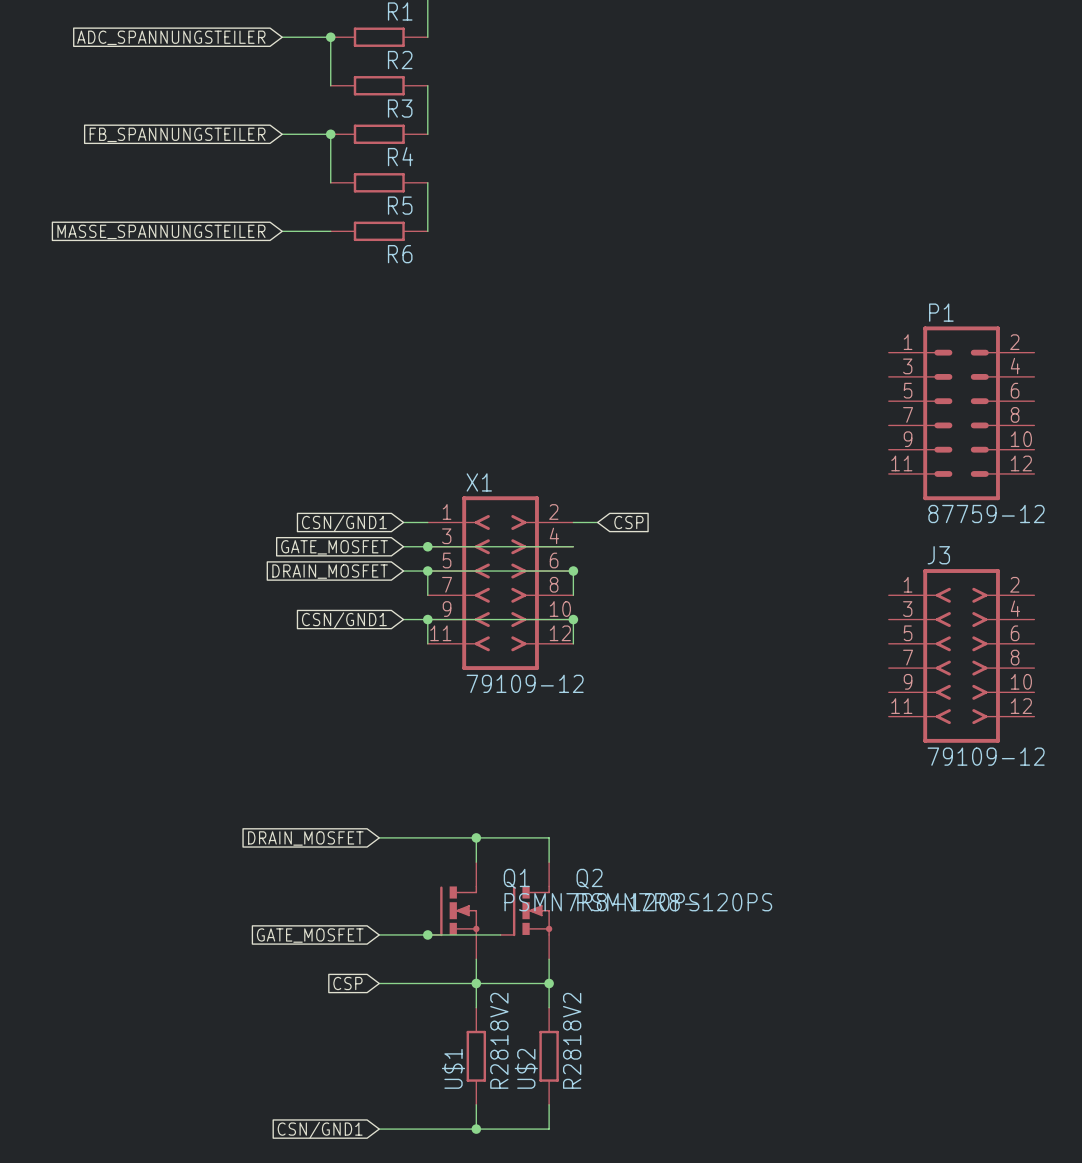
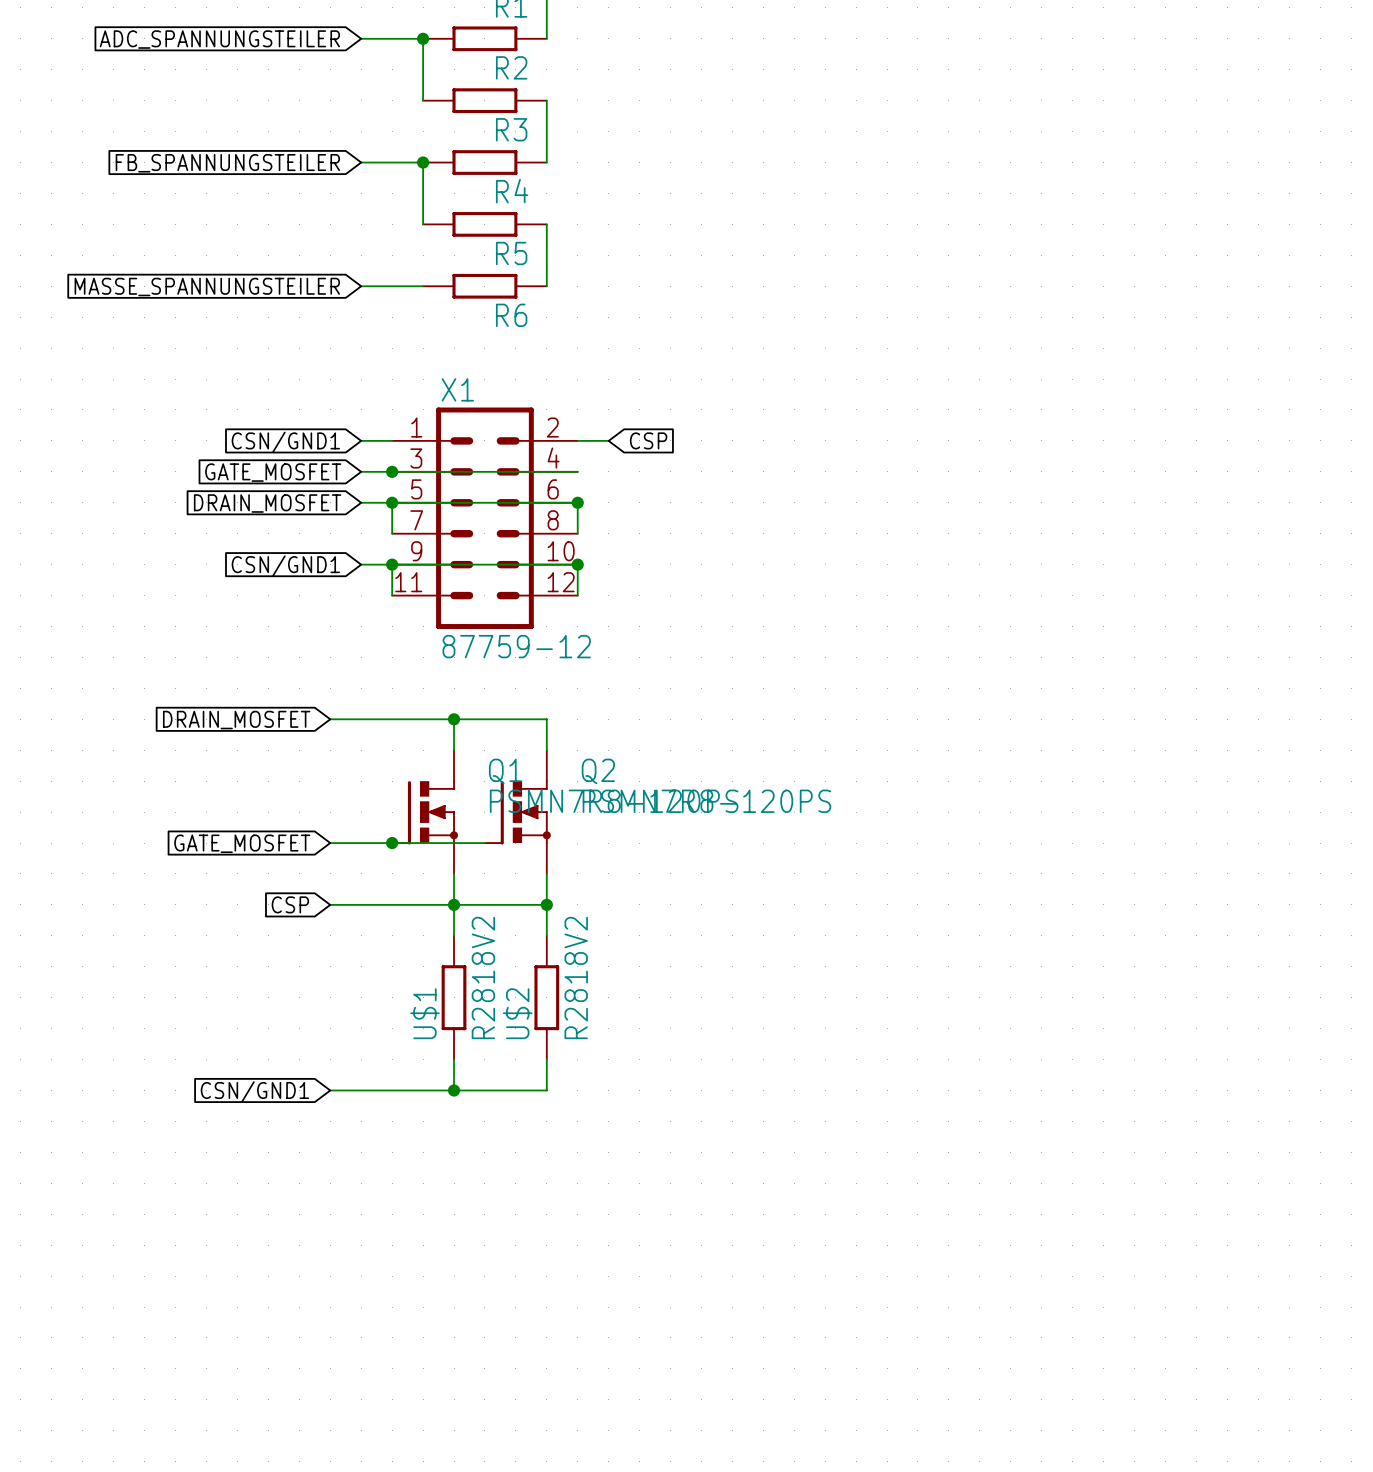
global label: none -> CSP (648, 440)
global label: none -> CSN/GND1 (285, 442)
junction: none -> (392, 471)
global label: none -> GATE_MOSFET (273, 472)
global label: none -> DRAIN_MOSFET (267, 503)
wire: none -> (361, 502) (577, 502) (577, 533)
wire: none -> (392, 502) (392, 533)
junction: none -> (392, 502)
junction: none -> (577, 502)
P1: 87759-12 (961, 413) -> none
junction: none -> (392, 564)
junction: none -> (577, 564)
global label: none -> CSN/GND1 (285, 566)
X1 symbol: [427, 496, 574, 671] -> [392, 407, 578, 629]
wire: (403, 522) (427, 522) -> (361, 440) (392, 440)
wire: (573, 522) (597, 522) -> (577, 440) (608, 440)
global label: CSP (628, 522) -> none
global label: CSN/GND1 (344, 523) -> none
wire: (403, 546) (573, 546) -> (361, 471) (577, 471)
junction: (427, 546) -> none
global label: GATE_MOSFET (334, 547) -> none
global label: none -> DRAIN_MOSFET (236, 720)
wire: none -> (330, 719) (515, 719)
global label: DRAIN_MOSFET (330, 571) -> none
wire: none -> (454, 719) (454, 750)
junction: none -> (454, 719)
wire: (427, 571) (573, 571) (573, 595) -> none
junction: (427, 571) -> none
junction: (573, 571) -> none
wire: (403, 619) (573, 619) (573, 643) -> (361, 564) (577, 564) (577, 595)
wire: (427, 619) (427, 643) -> (392, 564) (392, 595)
junction: (427, 619) -> none
junction: (573, 619) -> none
global label: CSN/GND1 (344, 620) -> none
J3: 79109-12 (961, 655) -> none
global label: none -> GATE_MOSFET (242, 843)
wire: none -> (330, 843) (484, 843)
junction: none -> (392, 843)
X1 value: 79109-12 (525, 683) -> 87759-12 (516, 646)
wire: none -> (454, 873) (454, 935)
wire: none -> (546, 873) (546, 935)
global label: none -> CSP (290, 904)
wire: none -> (330, 904) (546, 904)
junction: none -> (454, 904)
junction: none -> (546, 904)
wire: (379, 837) (549, 837) (549, 862) -> none
wire: none -> (546, 1059) (546, 1090) (330, 1090)
wire: (476, 837) (476, 862) -> (454, 1059) (454, 1090)
junction: (476, 837) -> none
global label: DRAIN_MOSFET (305, 838) -> none
junction: none -> (454, 1090)
global label: none -> CSN/GND1 (254, 1091)
Q1 position: (453, 910) -> (424, 812)
Q2 position: (526, 910) -> (517, 812)
wire: (379, 934) (500, 934) -> none
junction: (427, 934) -> none
global label: GATE_MOSFET (310, 935) -> none
wire: (476, 959) (476, 1007) -> none
wire: (549, 959) (549, 1007) -> none
global label: CSP (347, 983) -> none
wire: (379, 983) (549, 983) -> none
junction: (476, 983) -> none
junction: (549, 983) -> none
U$1 position: (476, 1056) -> (454, 997)
U$2 position: (549, 1056) -> (546, 997)
wire: (476, 1104) (476, 1129) -> none
wire: (549, 1104) (549, 1129) (379, 1129) -> none
junction: (476, 1129) -> none
global label: CSN/GND1 (320, 1130) -> none

